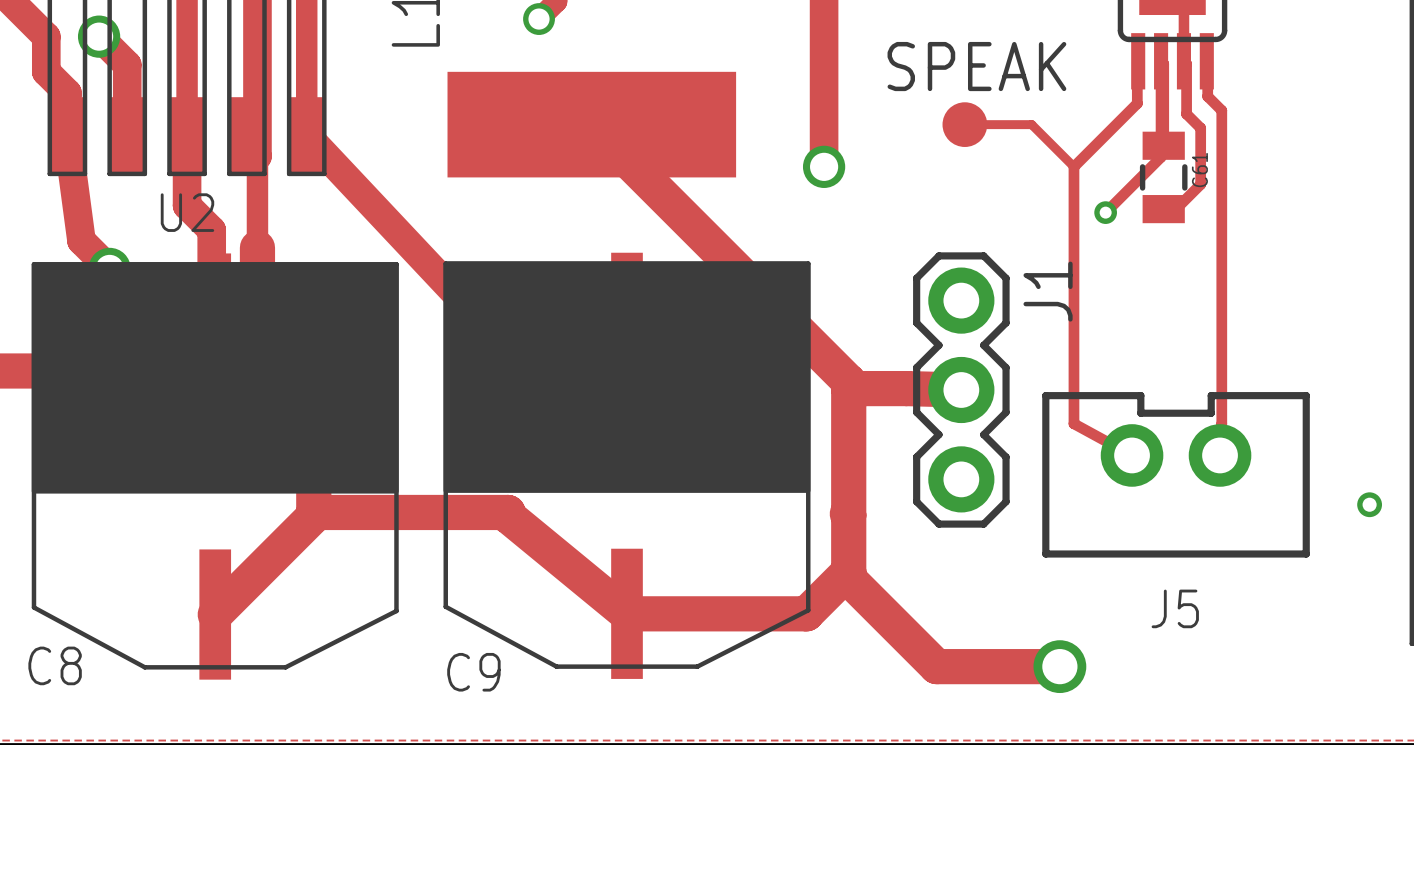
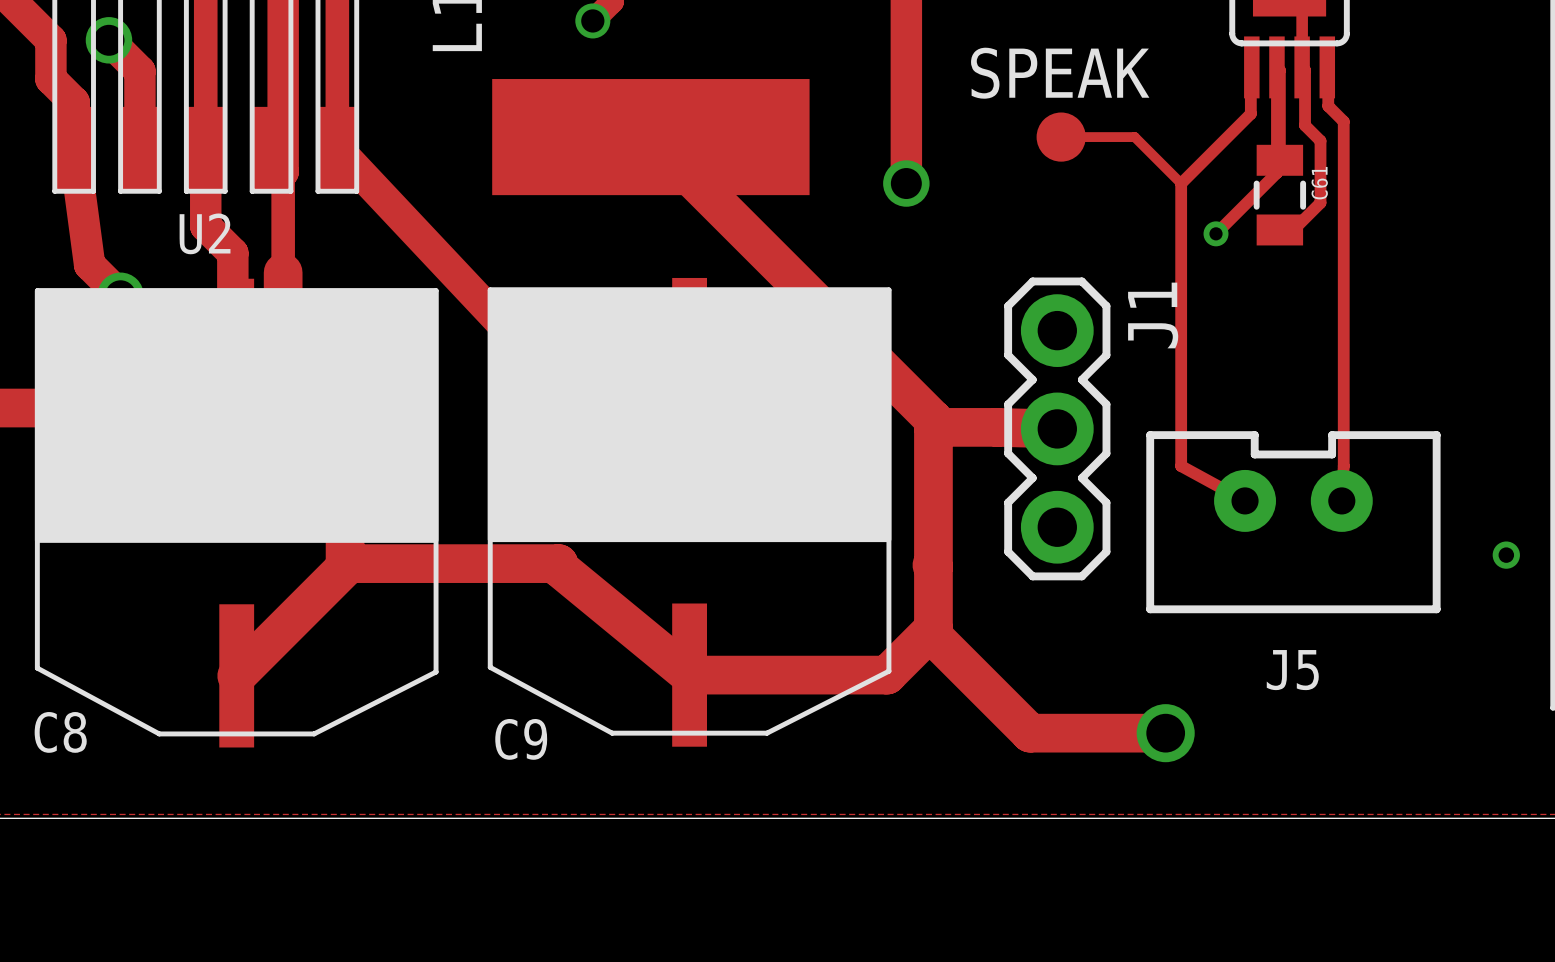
J5 footprint: [1042, 392, 1310, 558] -> [1146, 431, 1441, 614]

